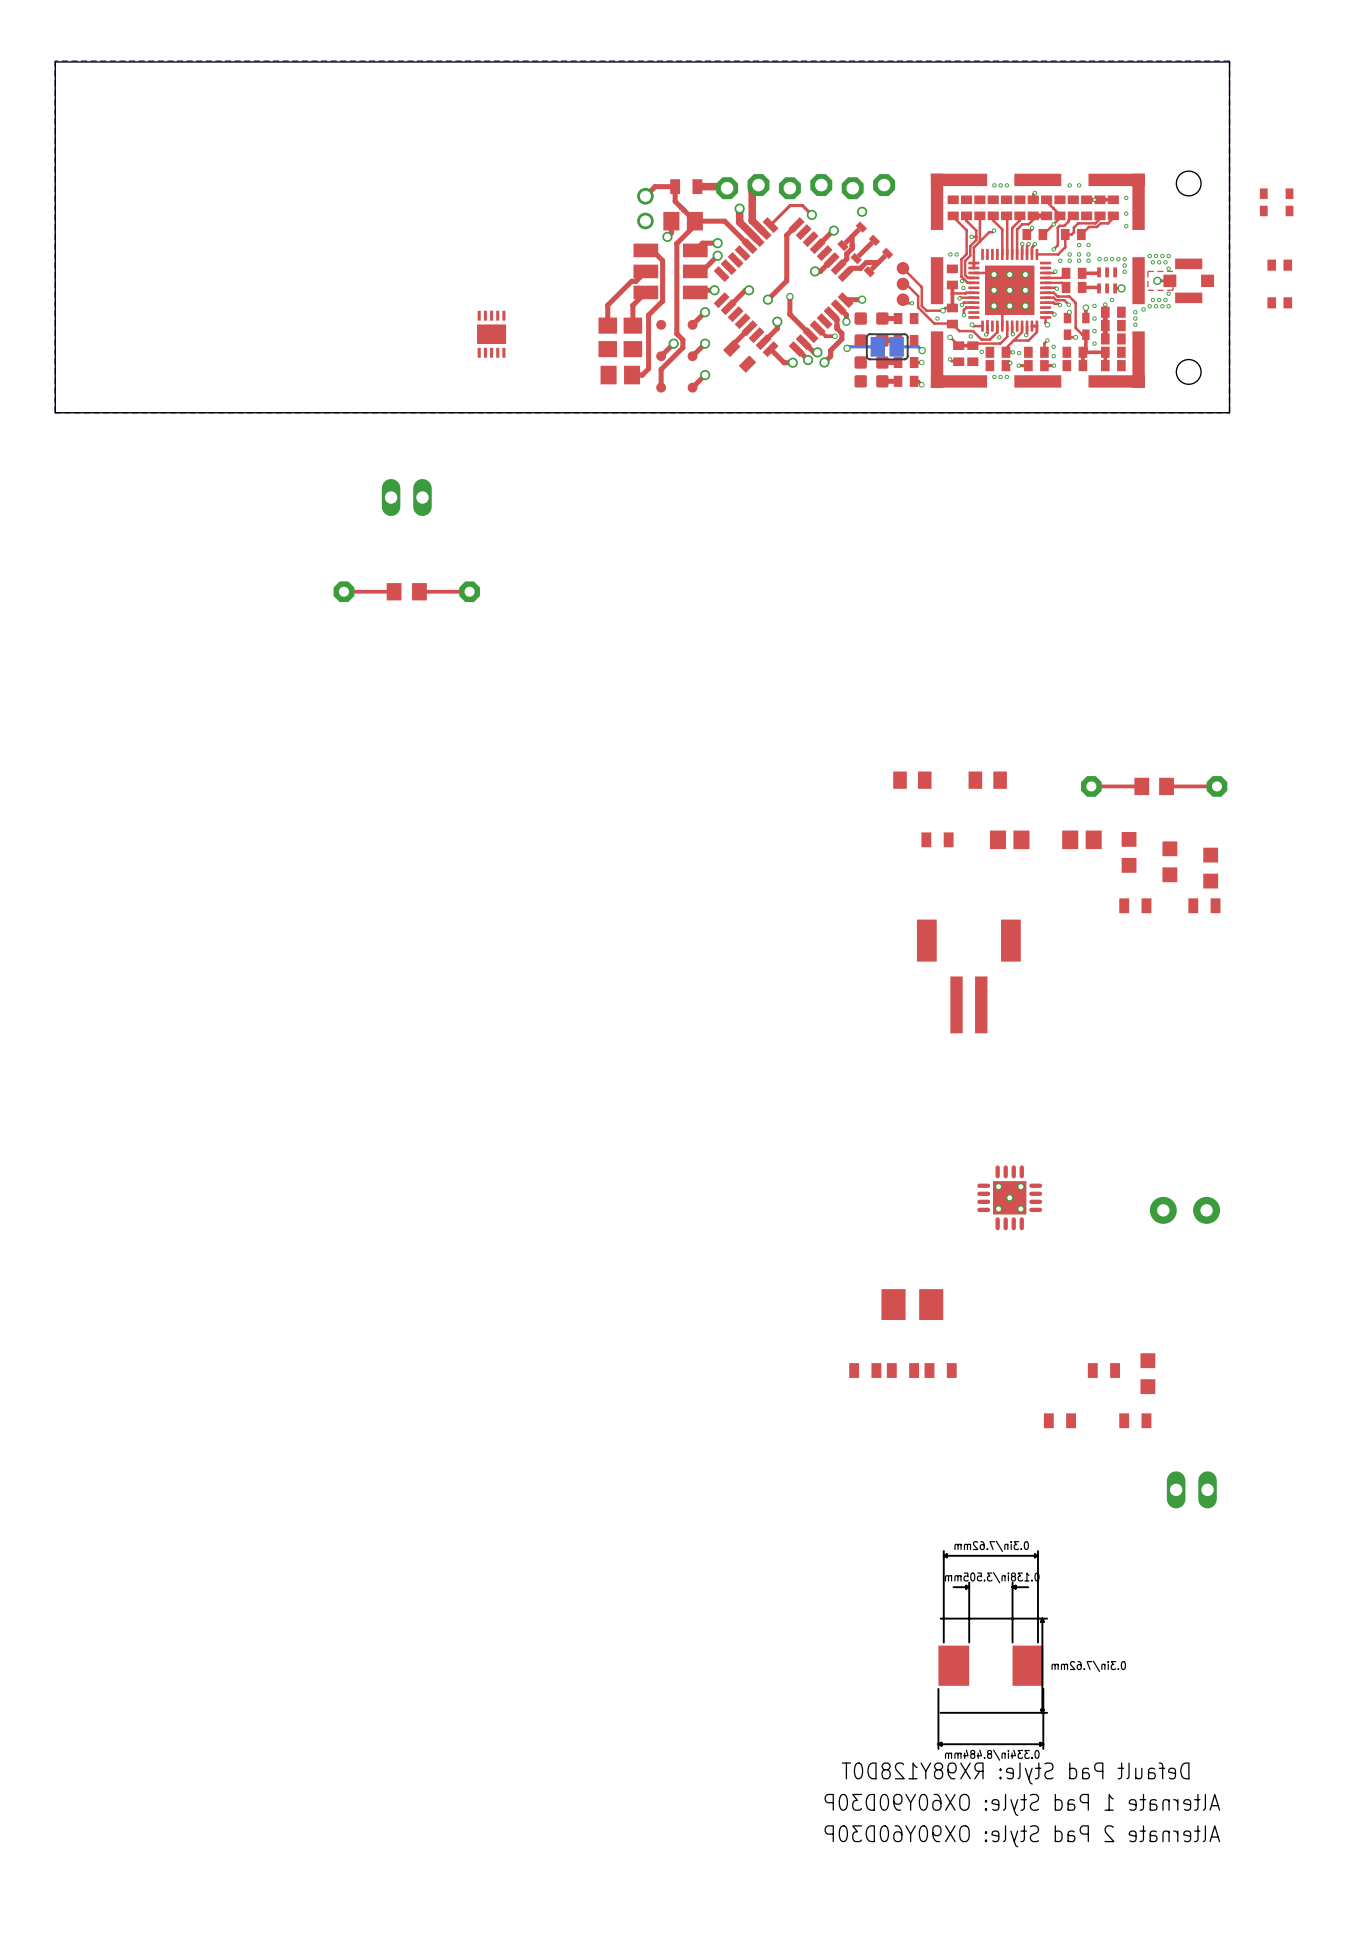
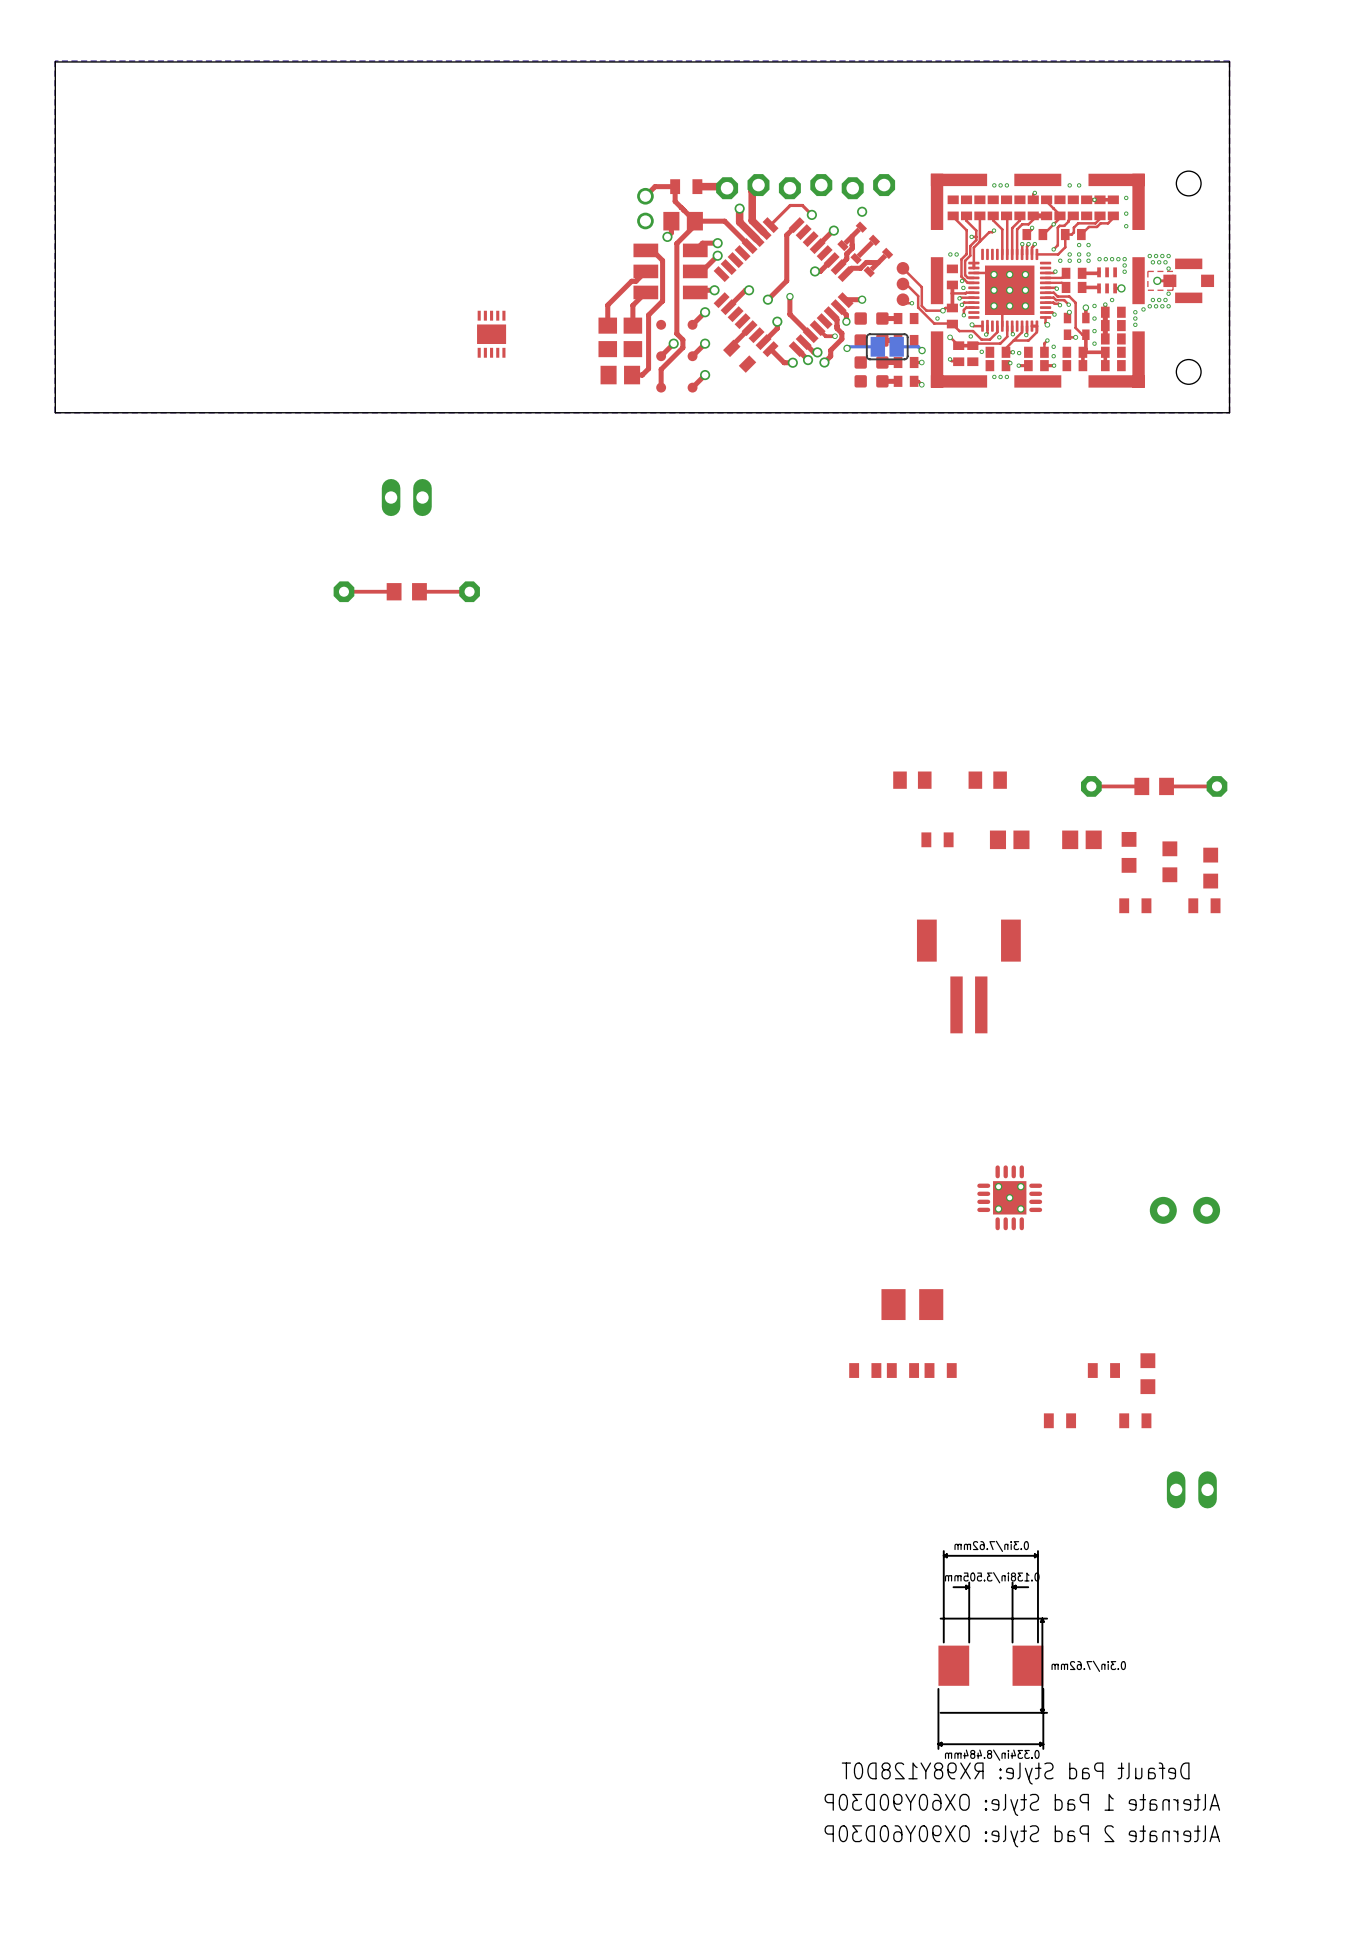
part: (1276, 202) -> none
part: (1279, 265) -> none
part: (1279, 302) -> none

